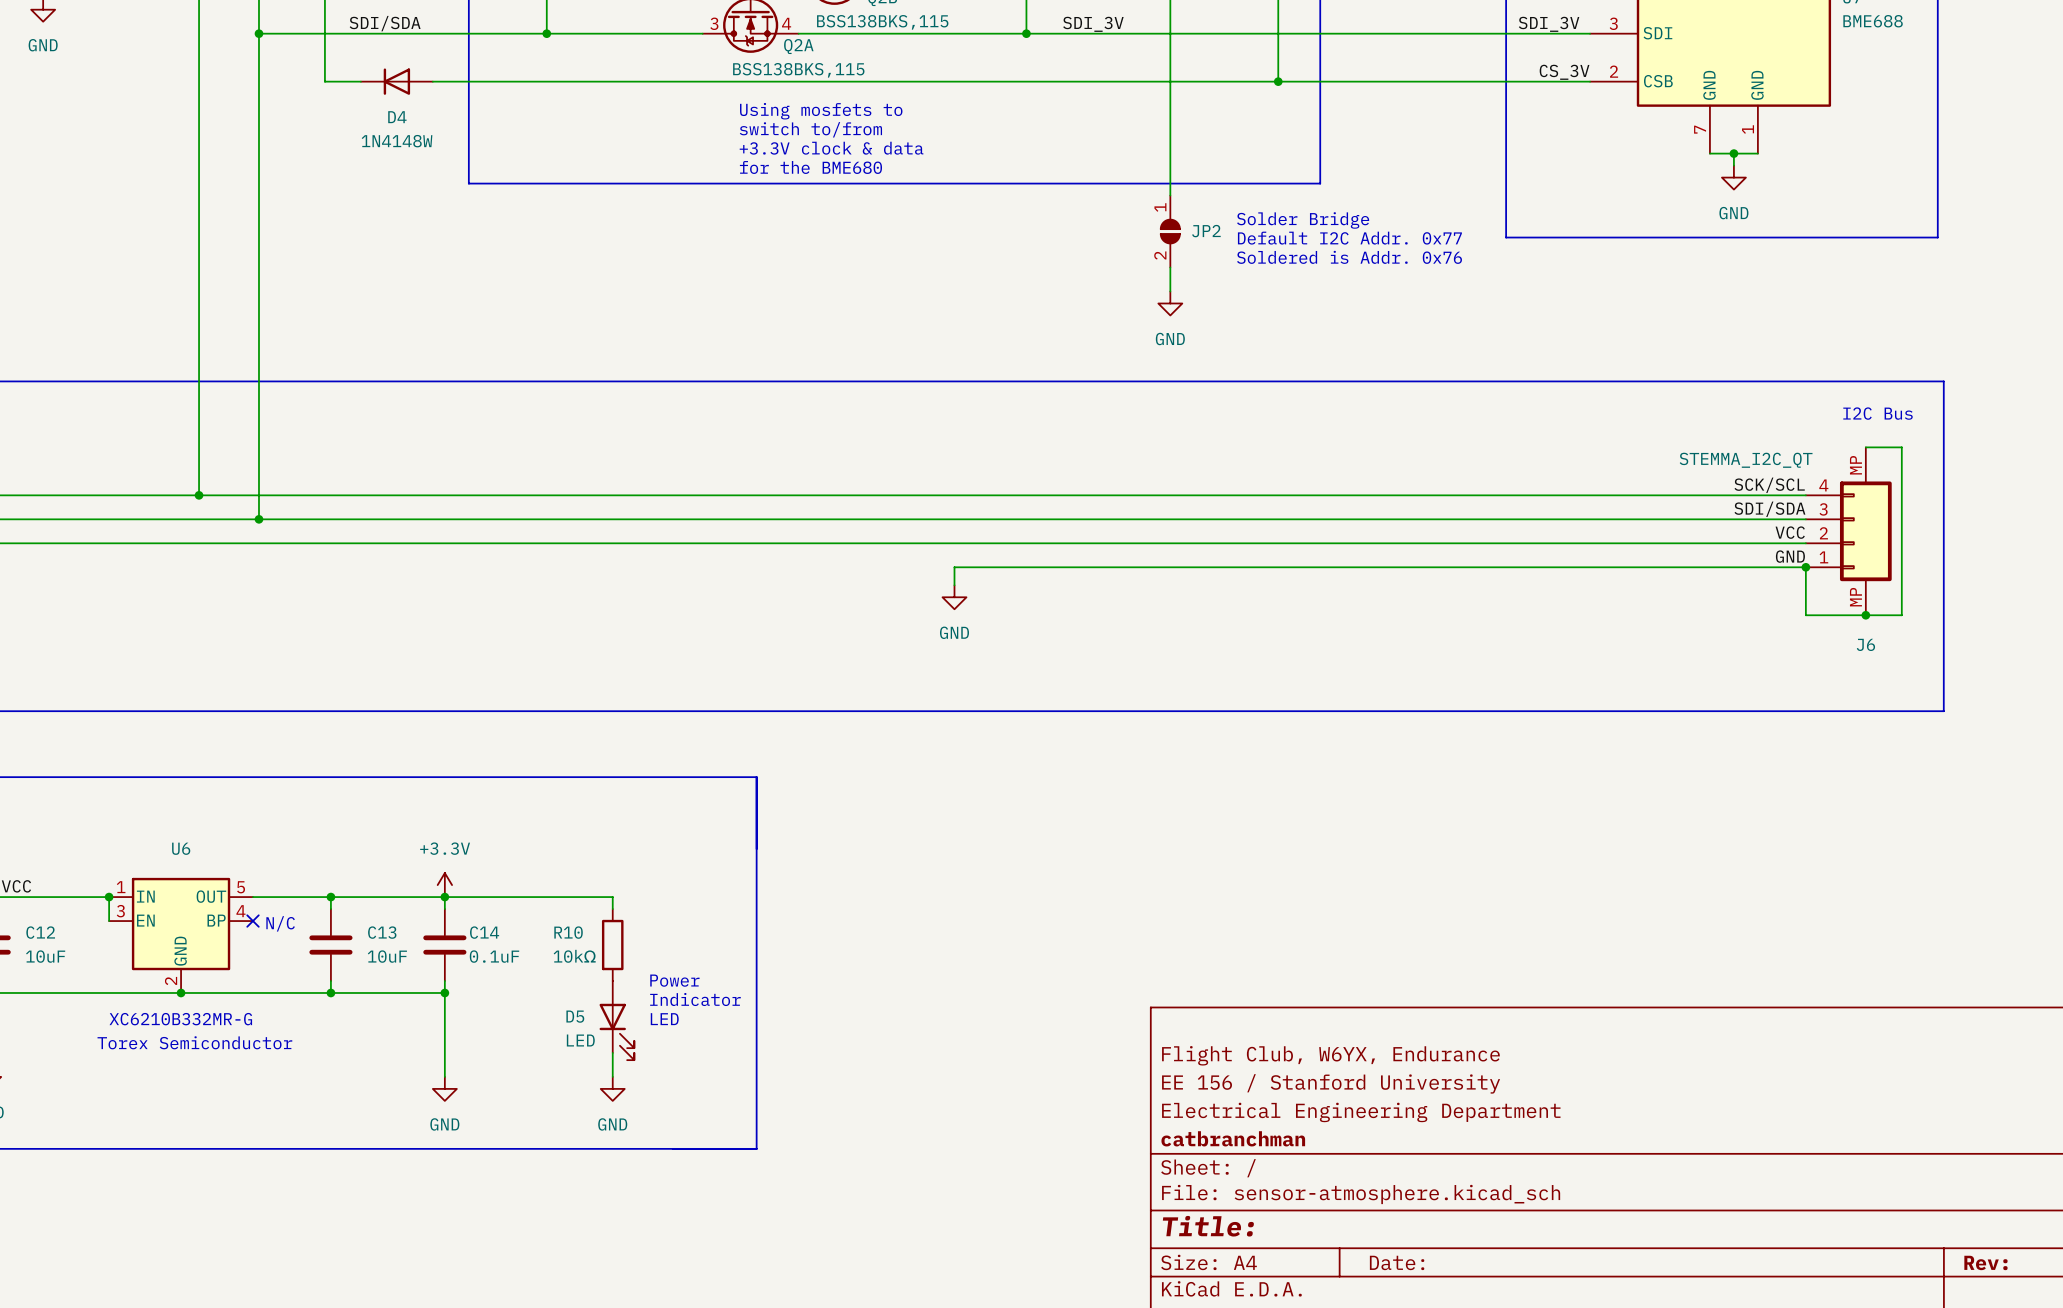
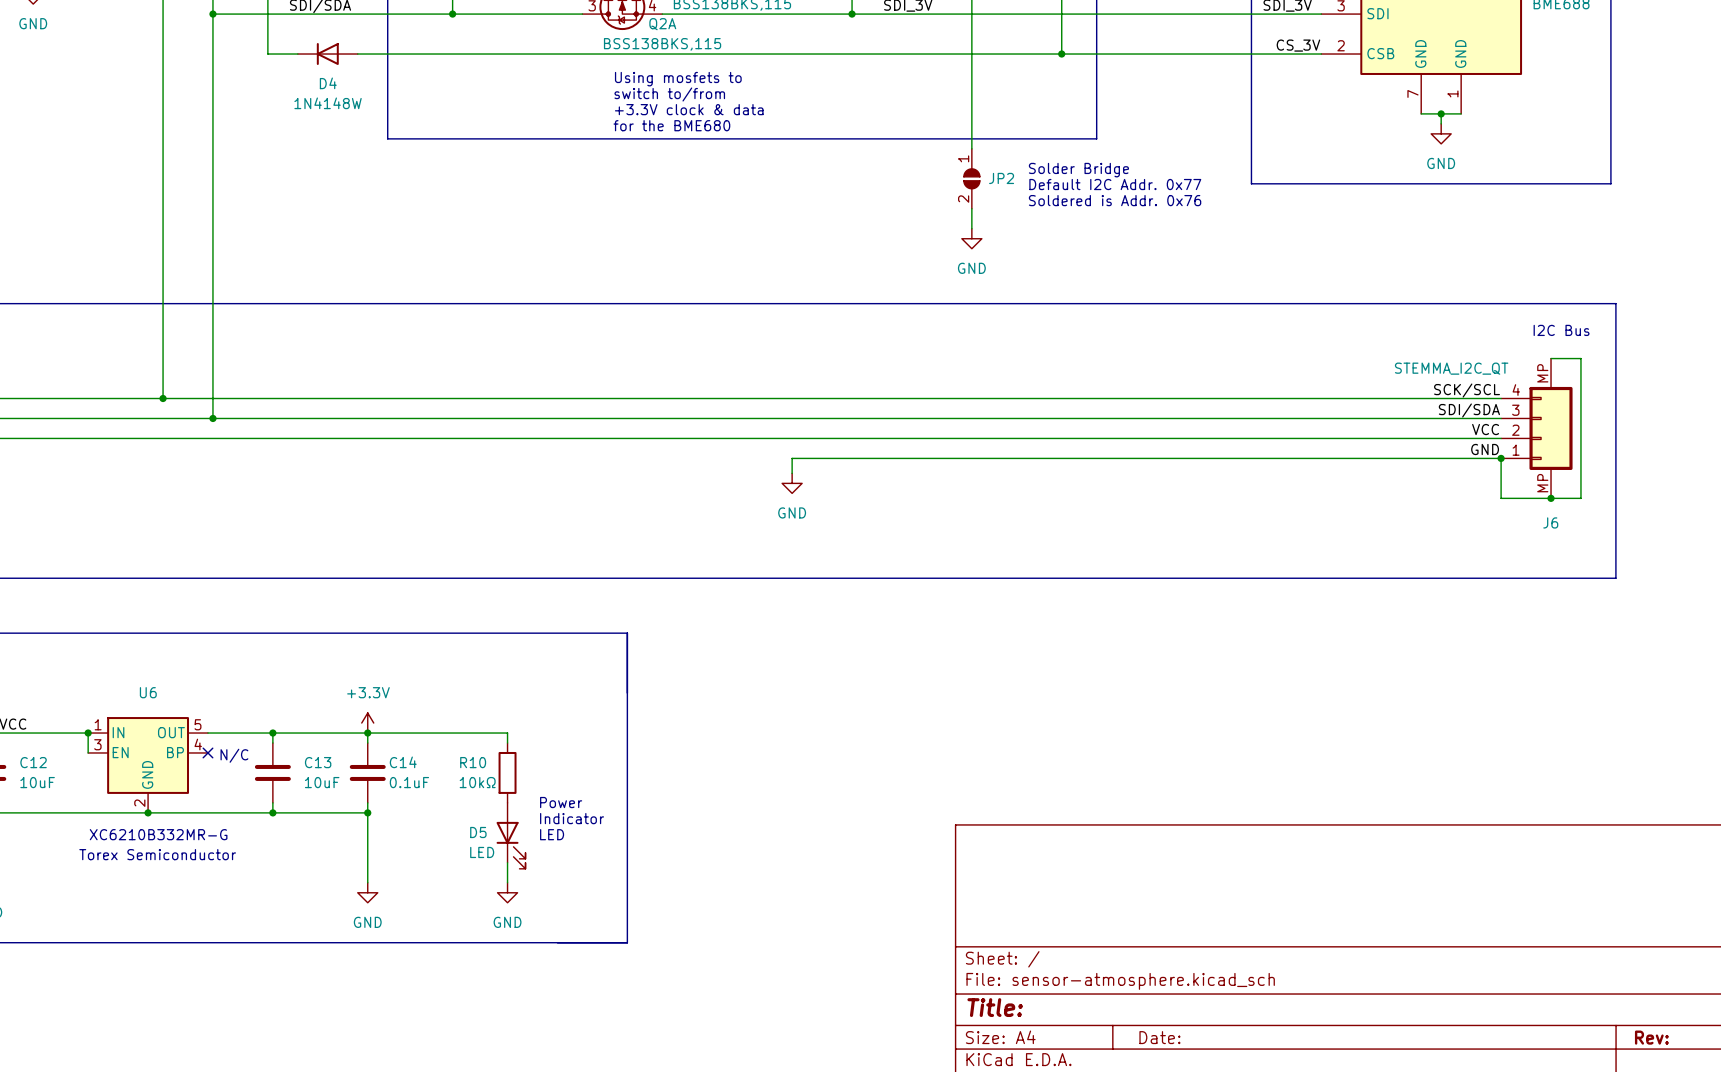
title block: Flight Club, W6YX, Endurance (1330, 1055) -> none
title block: EE 156 / Stanford University (1331, 1083) -> none
title block: Electrical Engineering Department (1361, 1112) -> none
title block: catbranchman (1233, 1138) -> none

